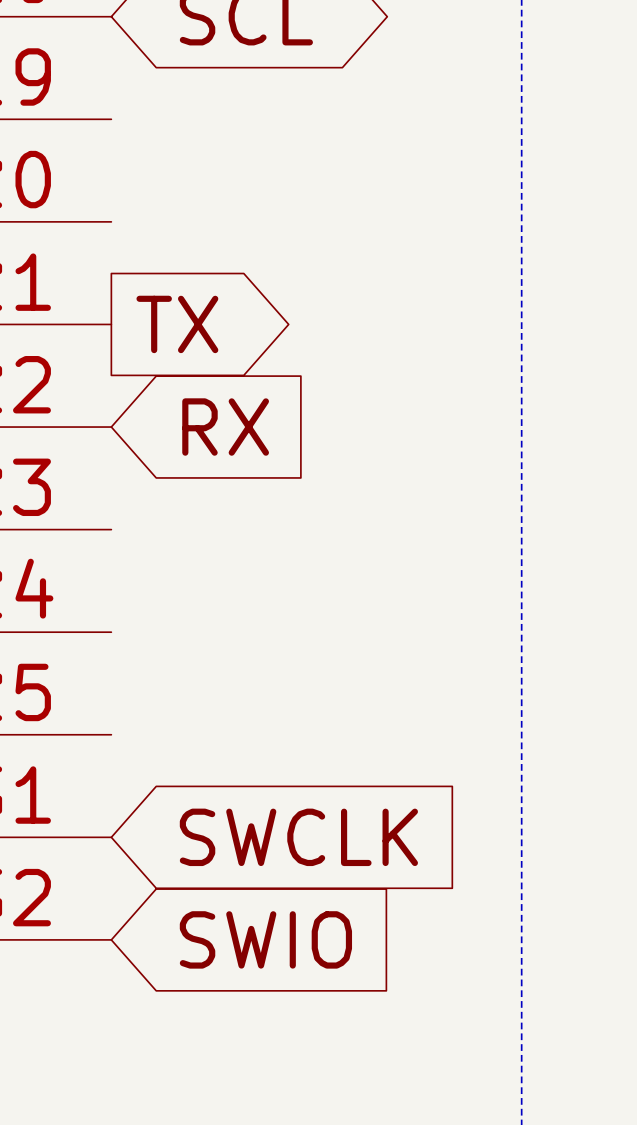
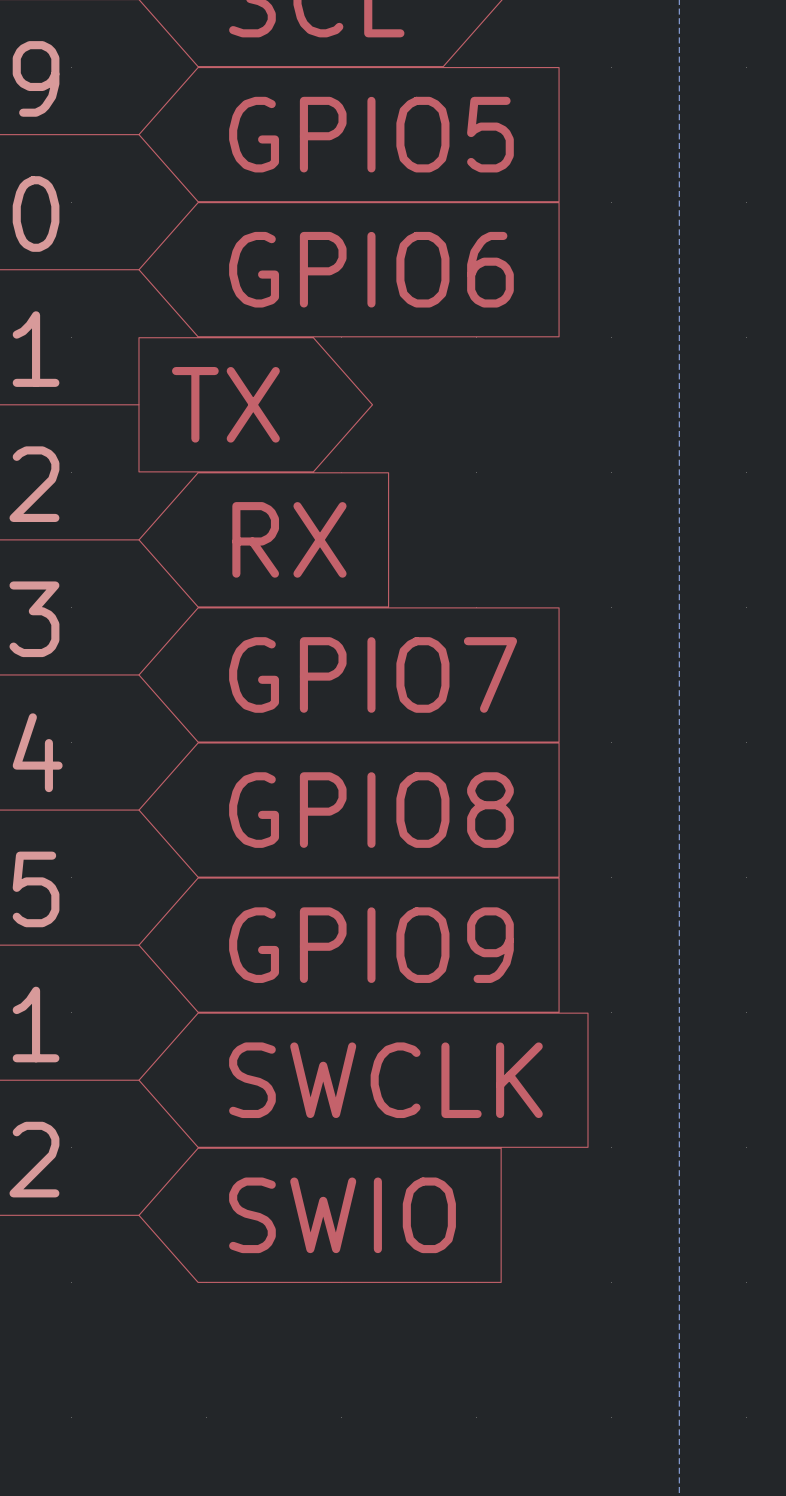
global label: none -> GPIO5 (371, 134)
global label: none -> GPIO6 (371, 269)
global label: none -> GPIO7 (373, 674)
global label: none -> GPIO8 (371, 810)
global label: none -> GPIO9 (371, 945)

